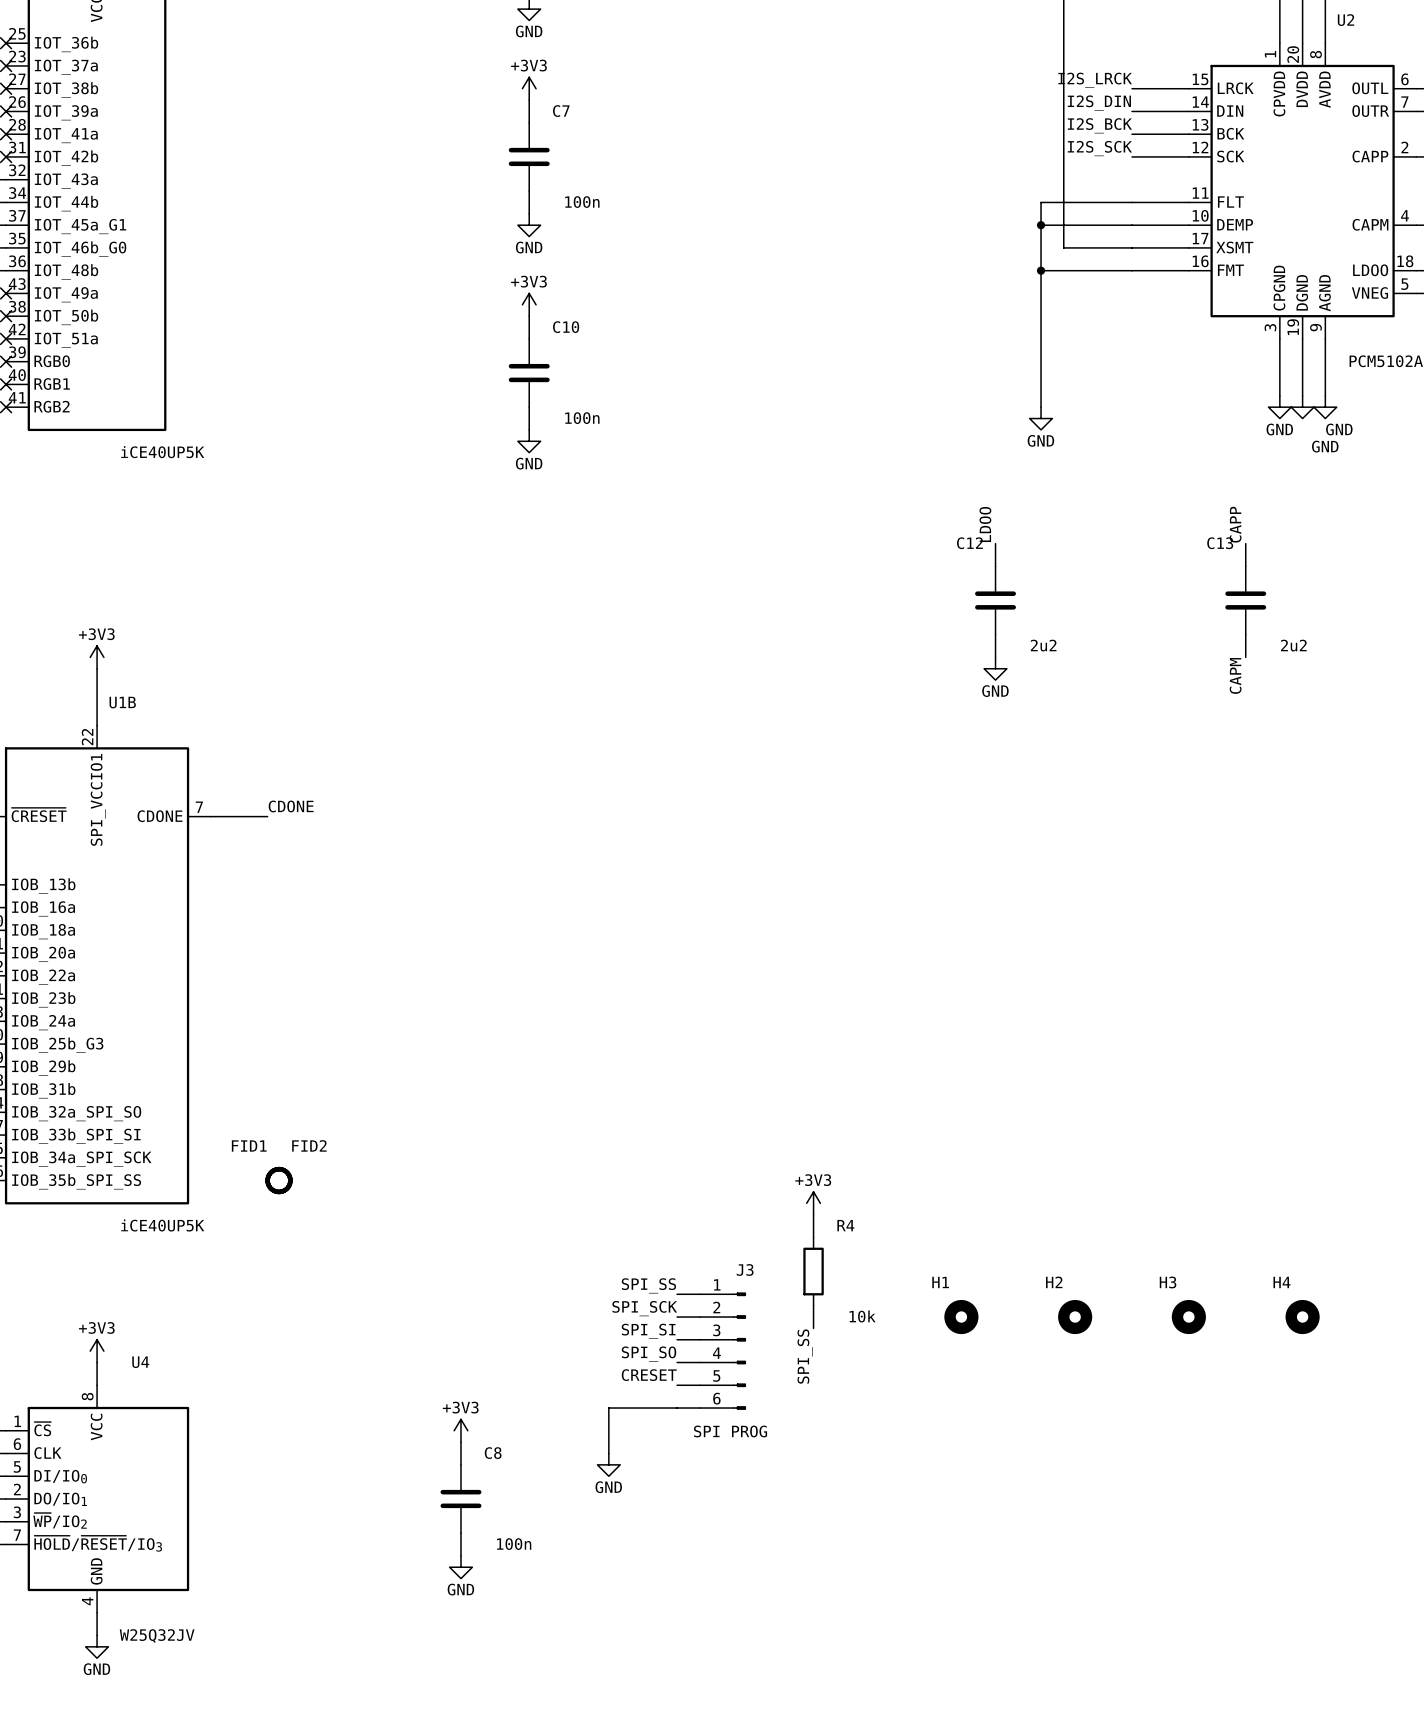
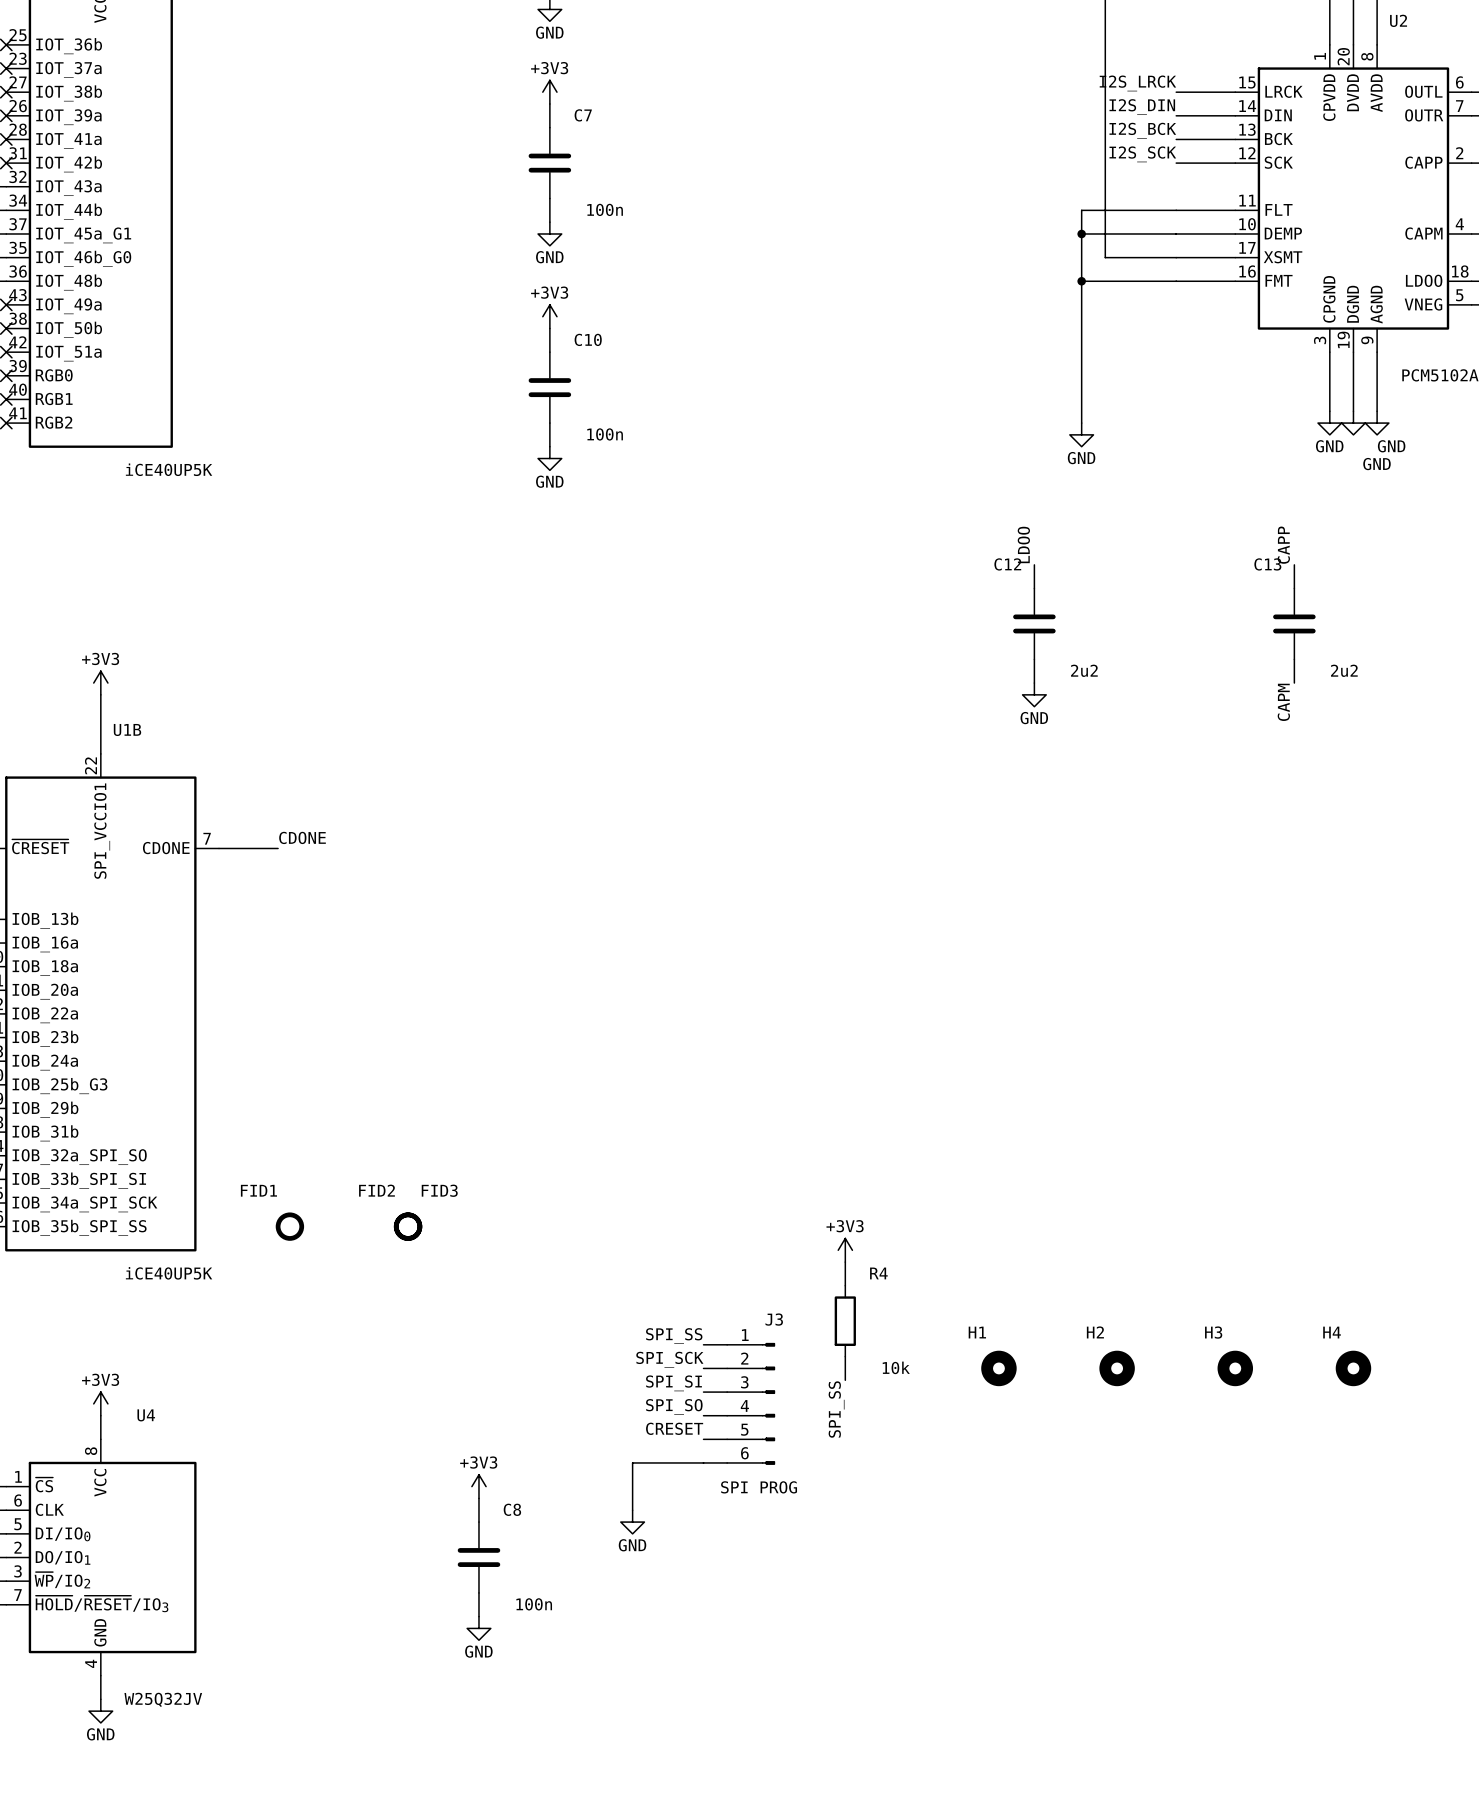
FID2 name position: FID2 (309, 1145) -> FID2 (376, 1190)
FID2 position: (279, 1180) -> (408, 1226)
FID3: none -> (408, 1226)

